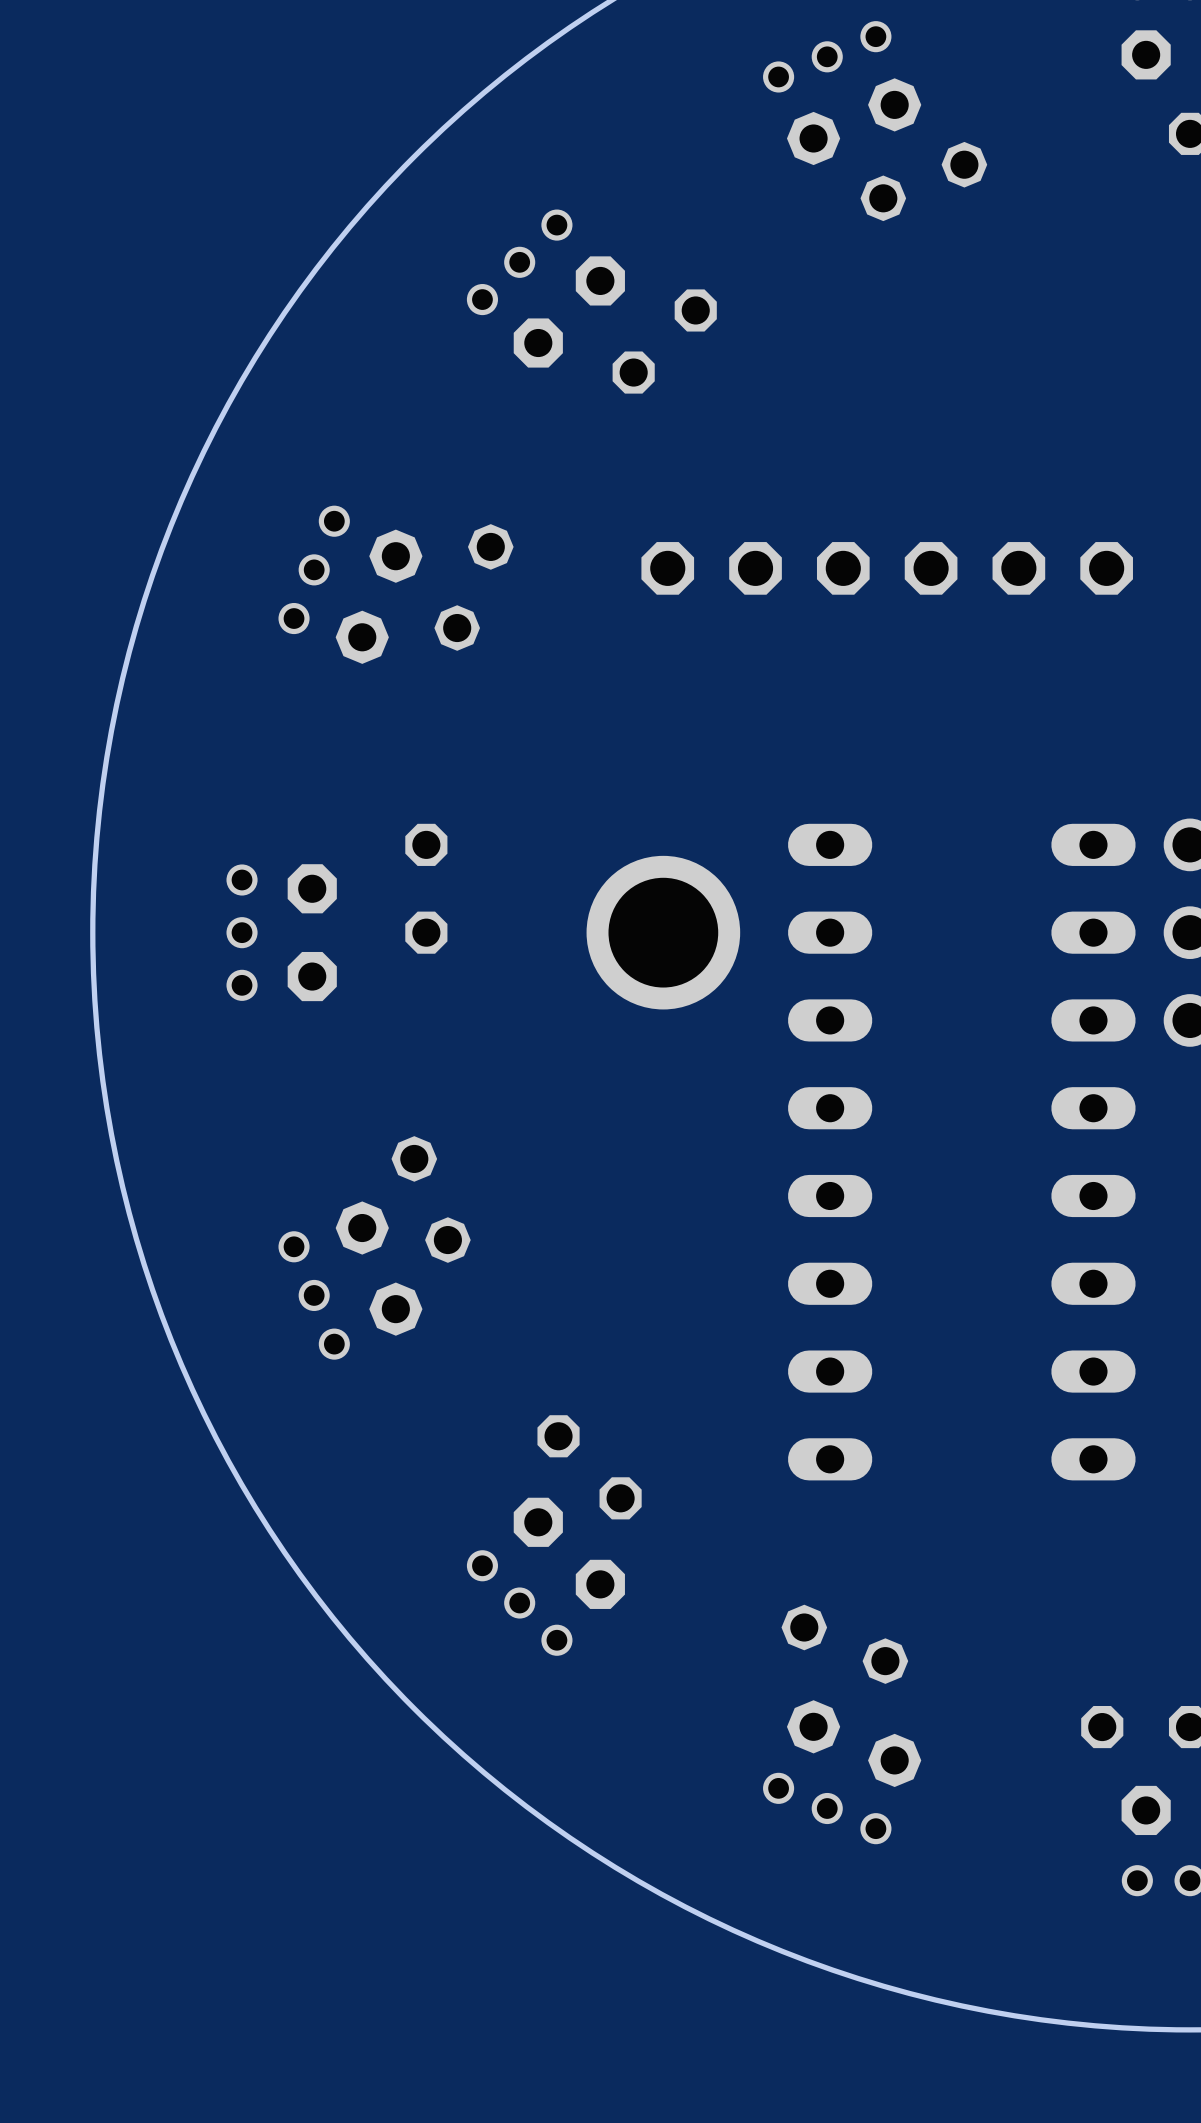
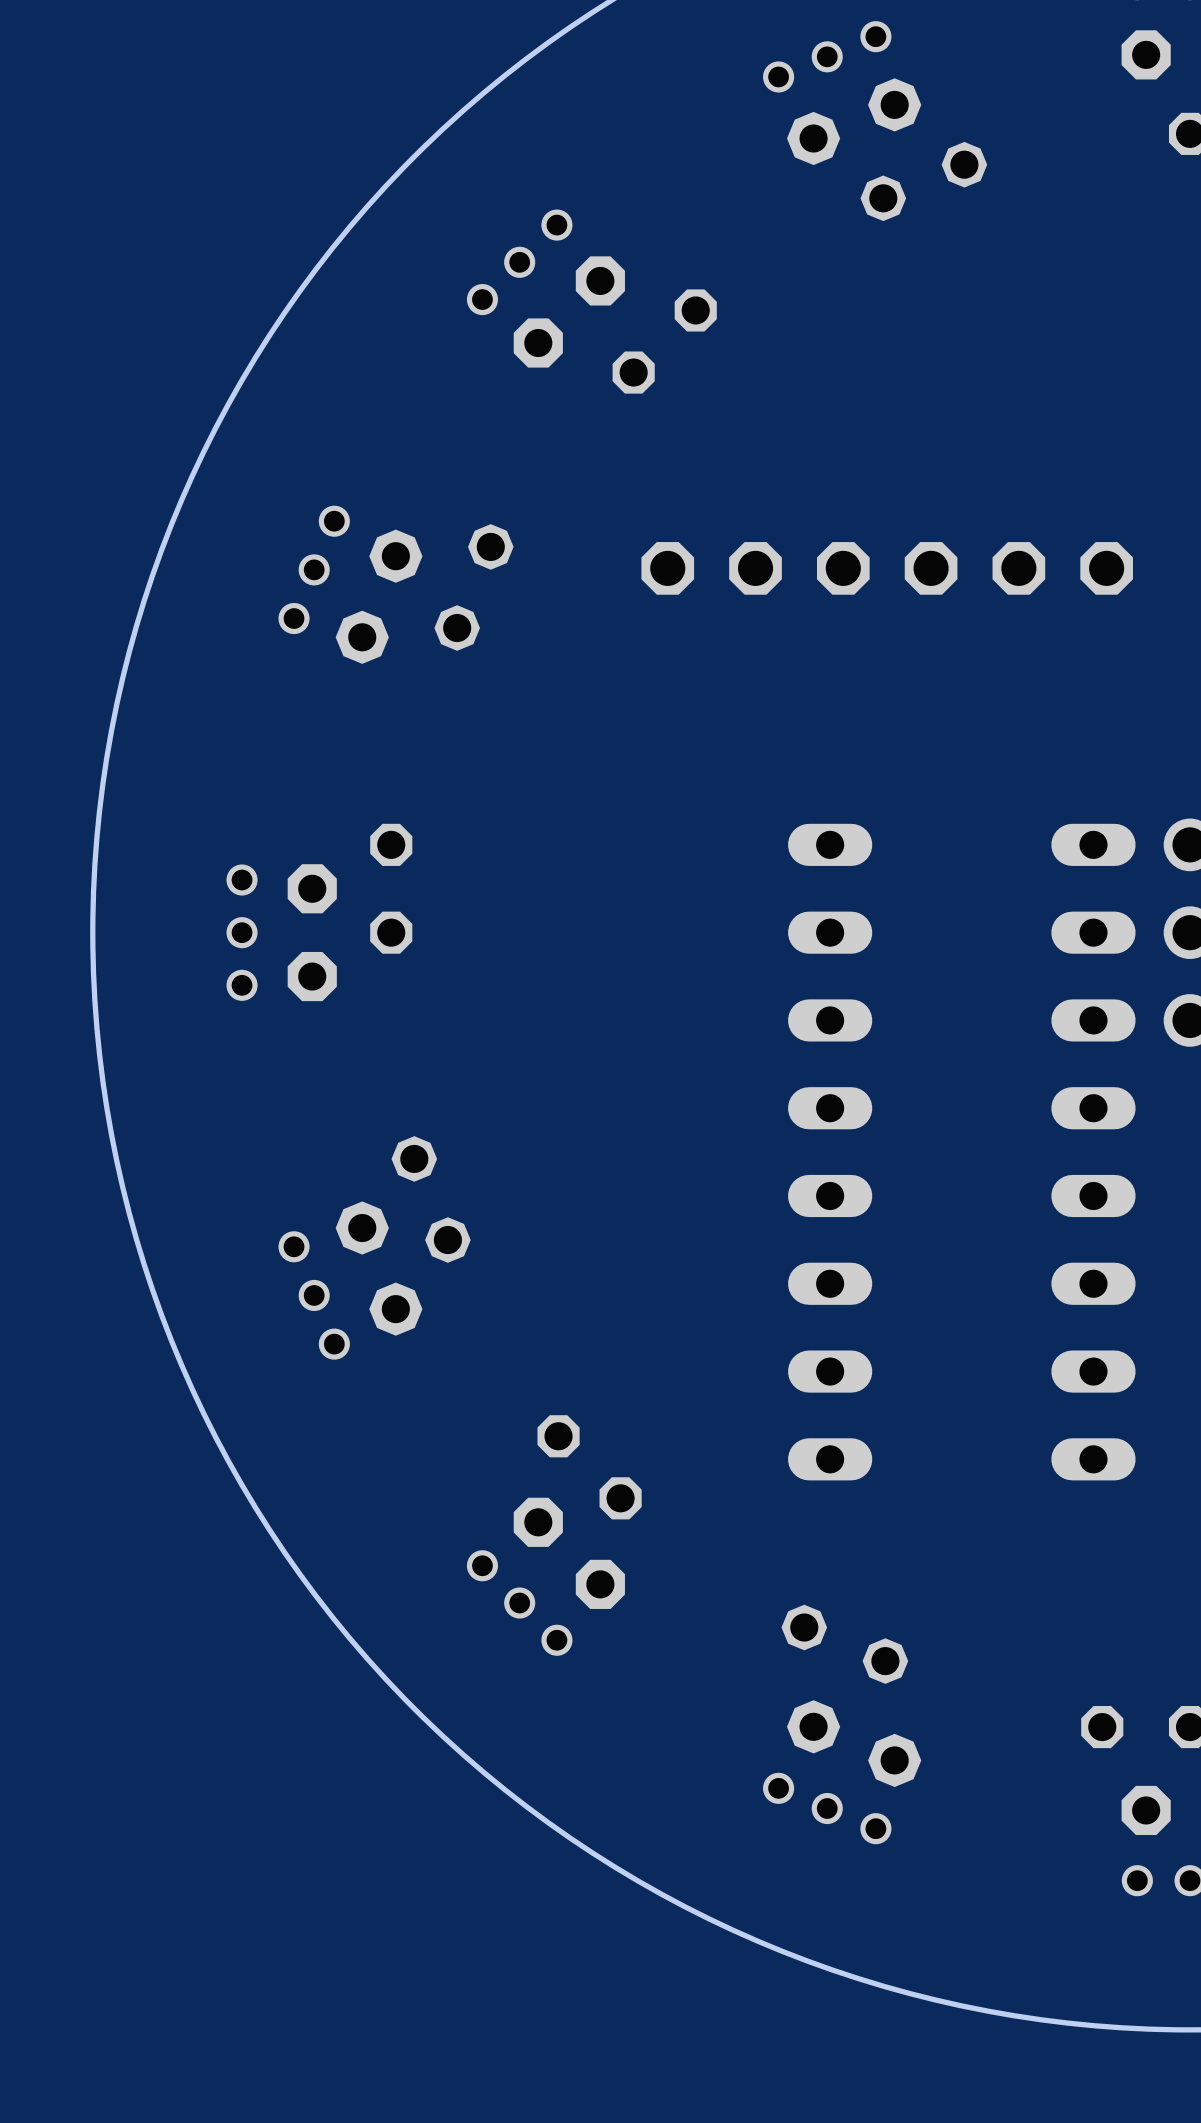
part position: (426, 888) -> (391, 888)
part: (663, 932) -> none

